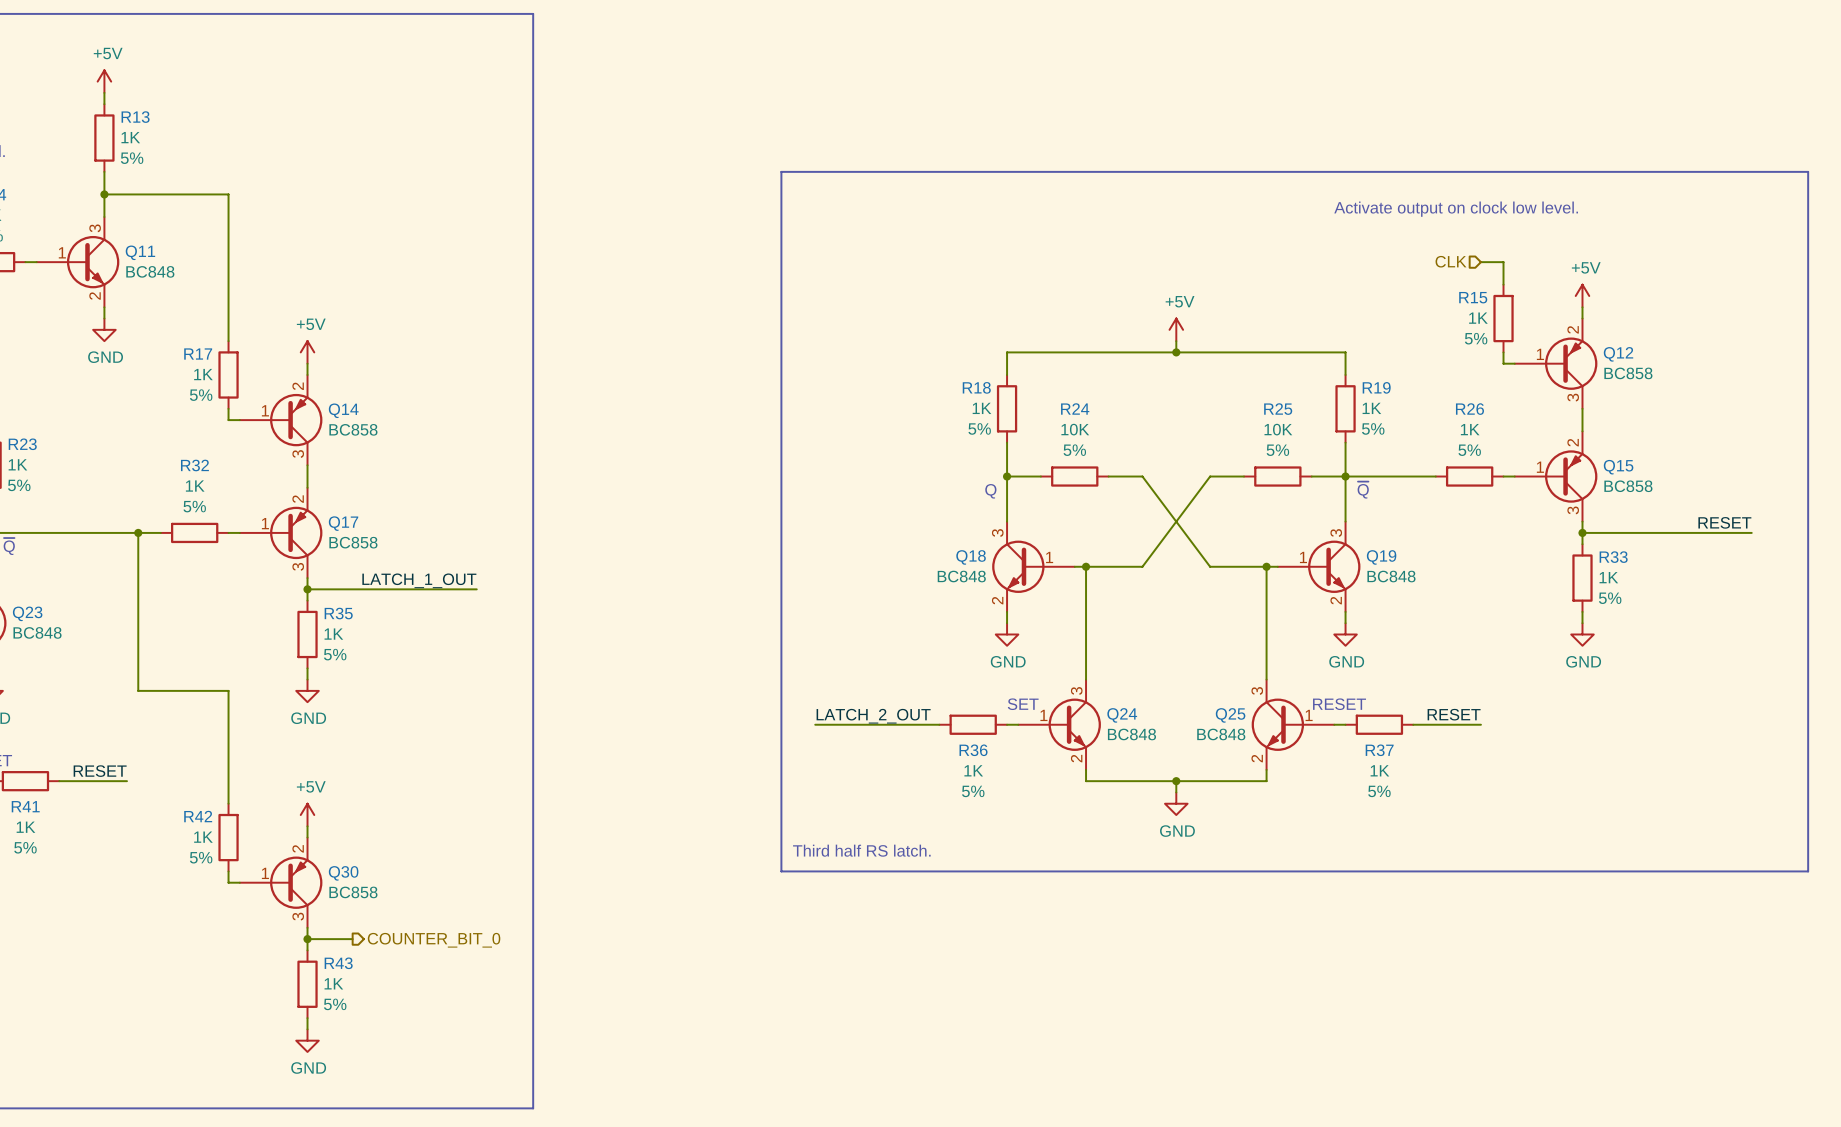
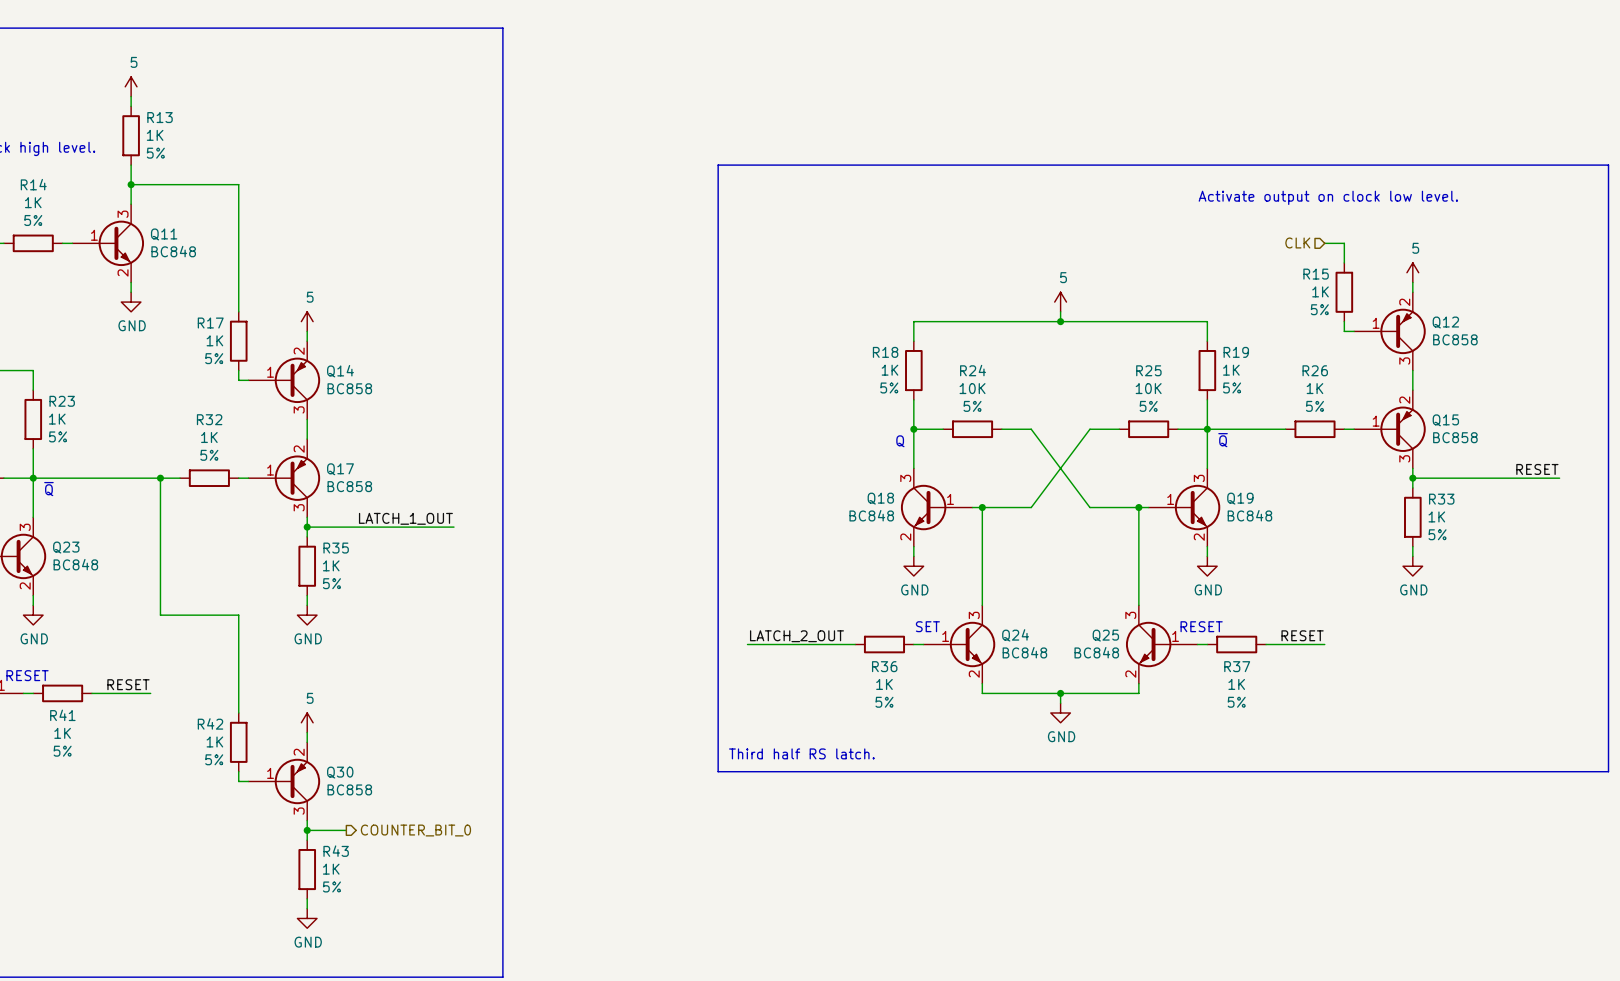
power symbol: +5V (104, 81) -> 5 (131, 86)
power symbol: +5V (1582, 295) -> 5 (1412, 272)
power symbol: +5V (1176, 329) -> 5 (1060, 302)
power symbol: +5V (307, 352) -> 5 (307, 321)
power symbol: +5V (307, 815) -> 5 (307, 722)

